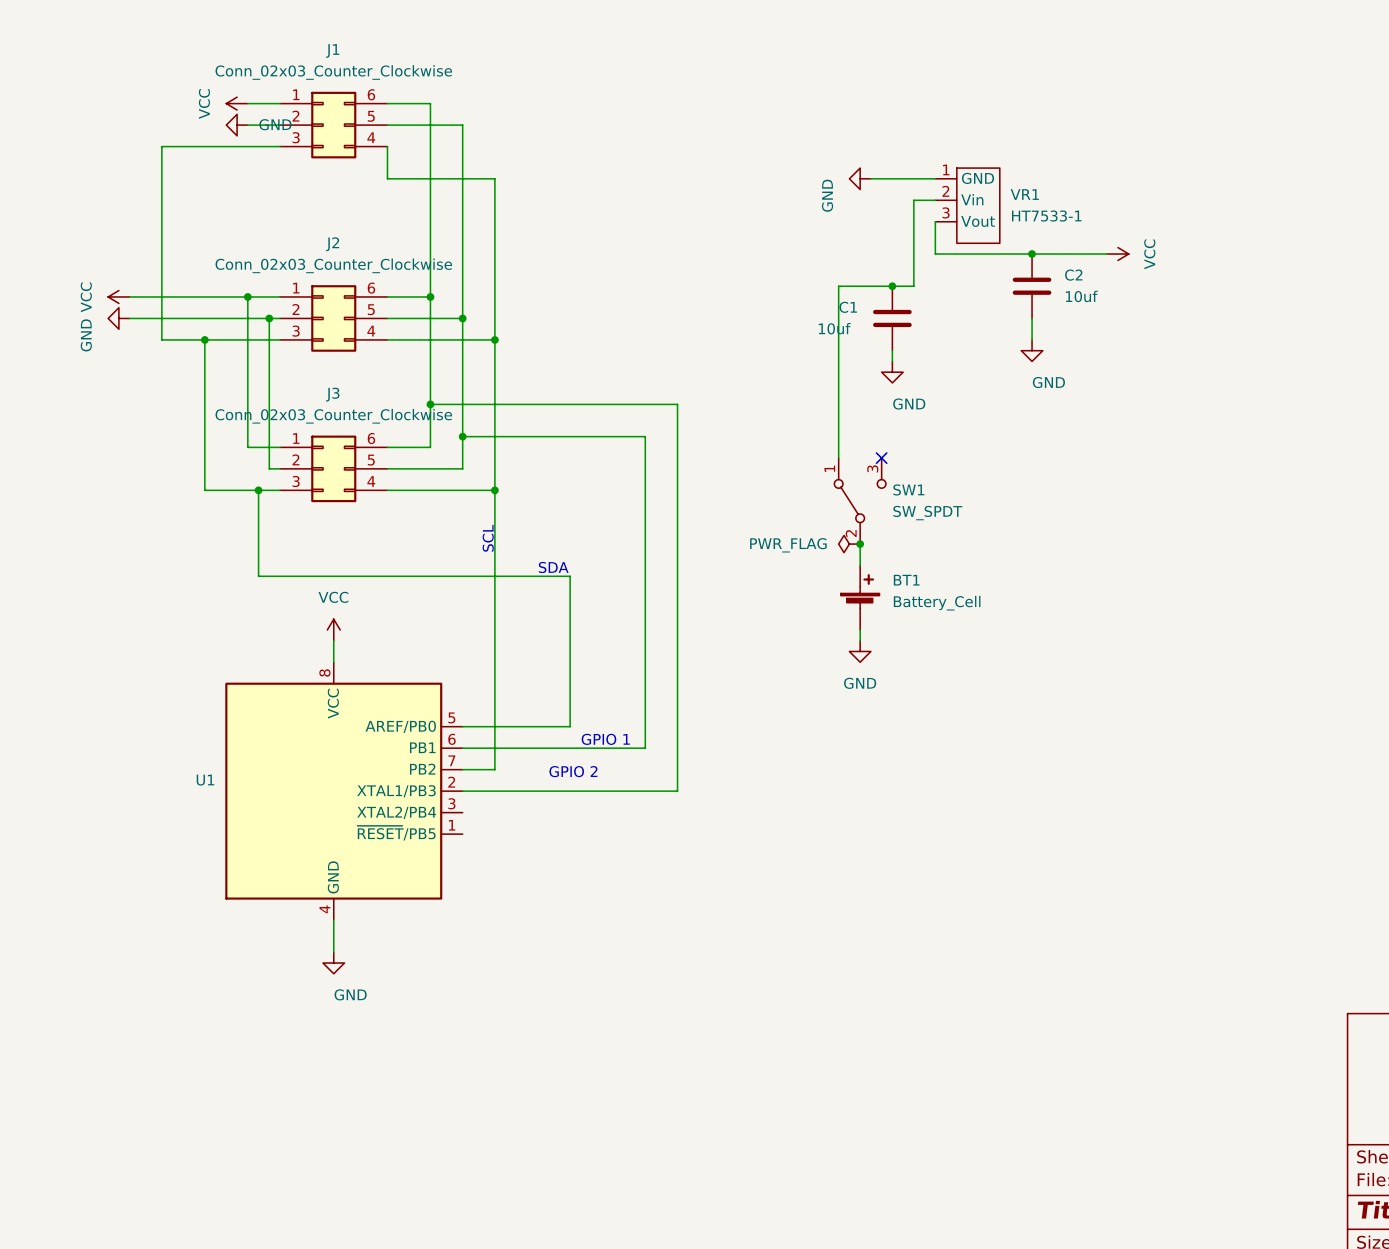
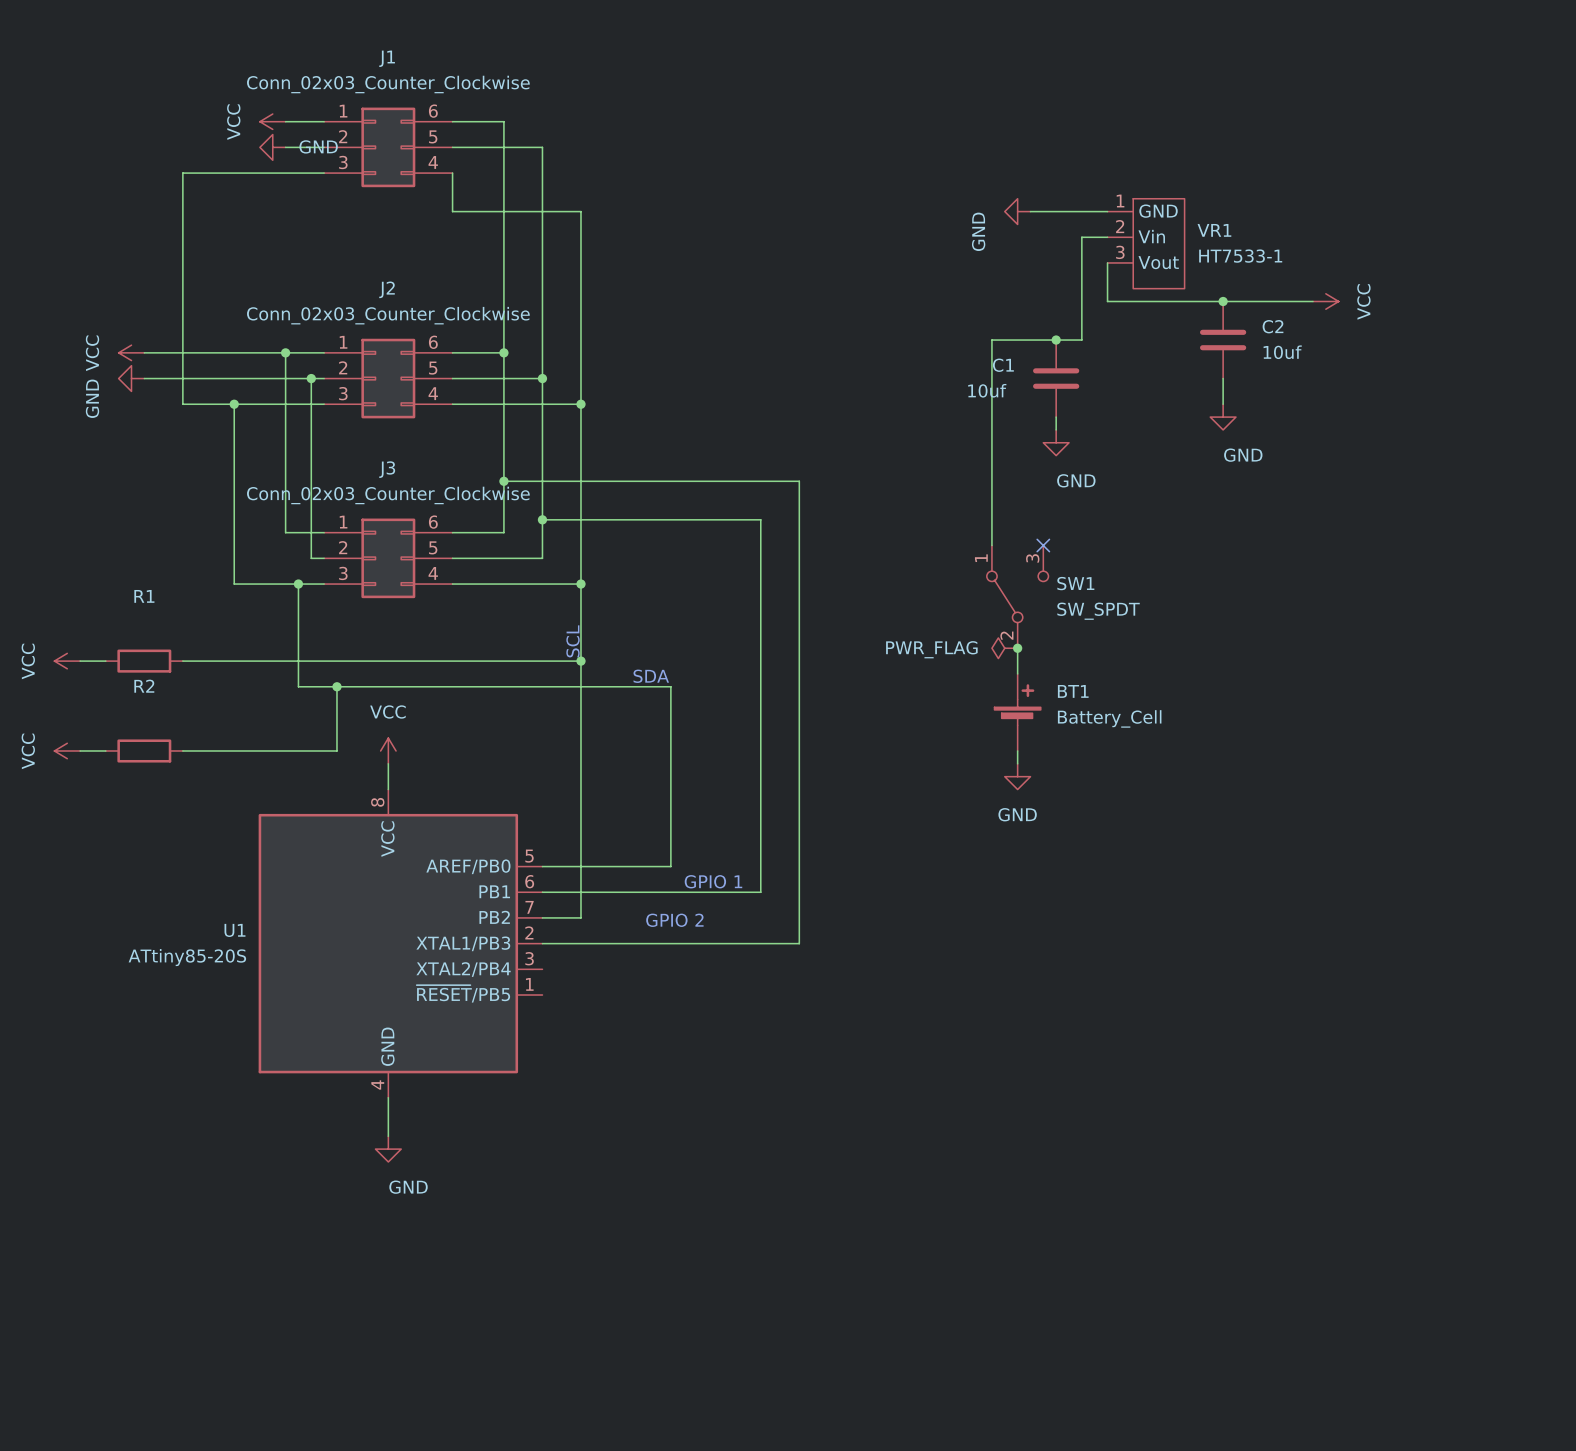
power symbol: none -> VCC (67, 661)
wire: none -> (80, 661) (105, 661)
R1: none -> (144, 661)
wire: none -> (182, 661) (580, 661)
junction: none -> (580, 661)
wire: none -> (336, 686) (336, 750) (182, 750)
junction: none -> (336, 686)
power symbol: none -> VCC (67, 750)
wire: none -> (80, 750) (105, 750)
R2: none -> (144, 750)
U1 value: none -> ATtiny85-20S (187, 957)

